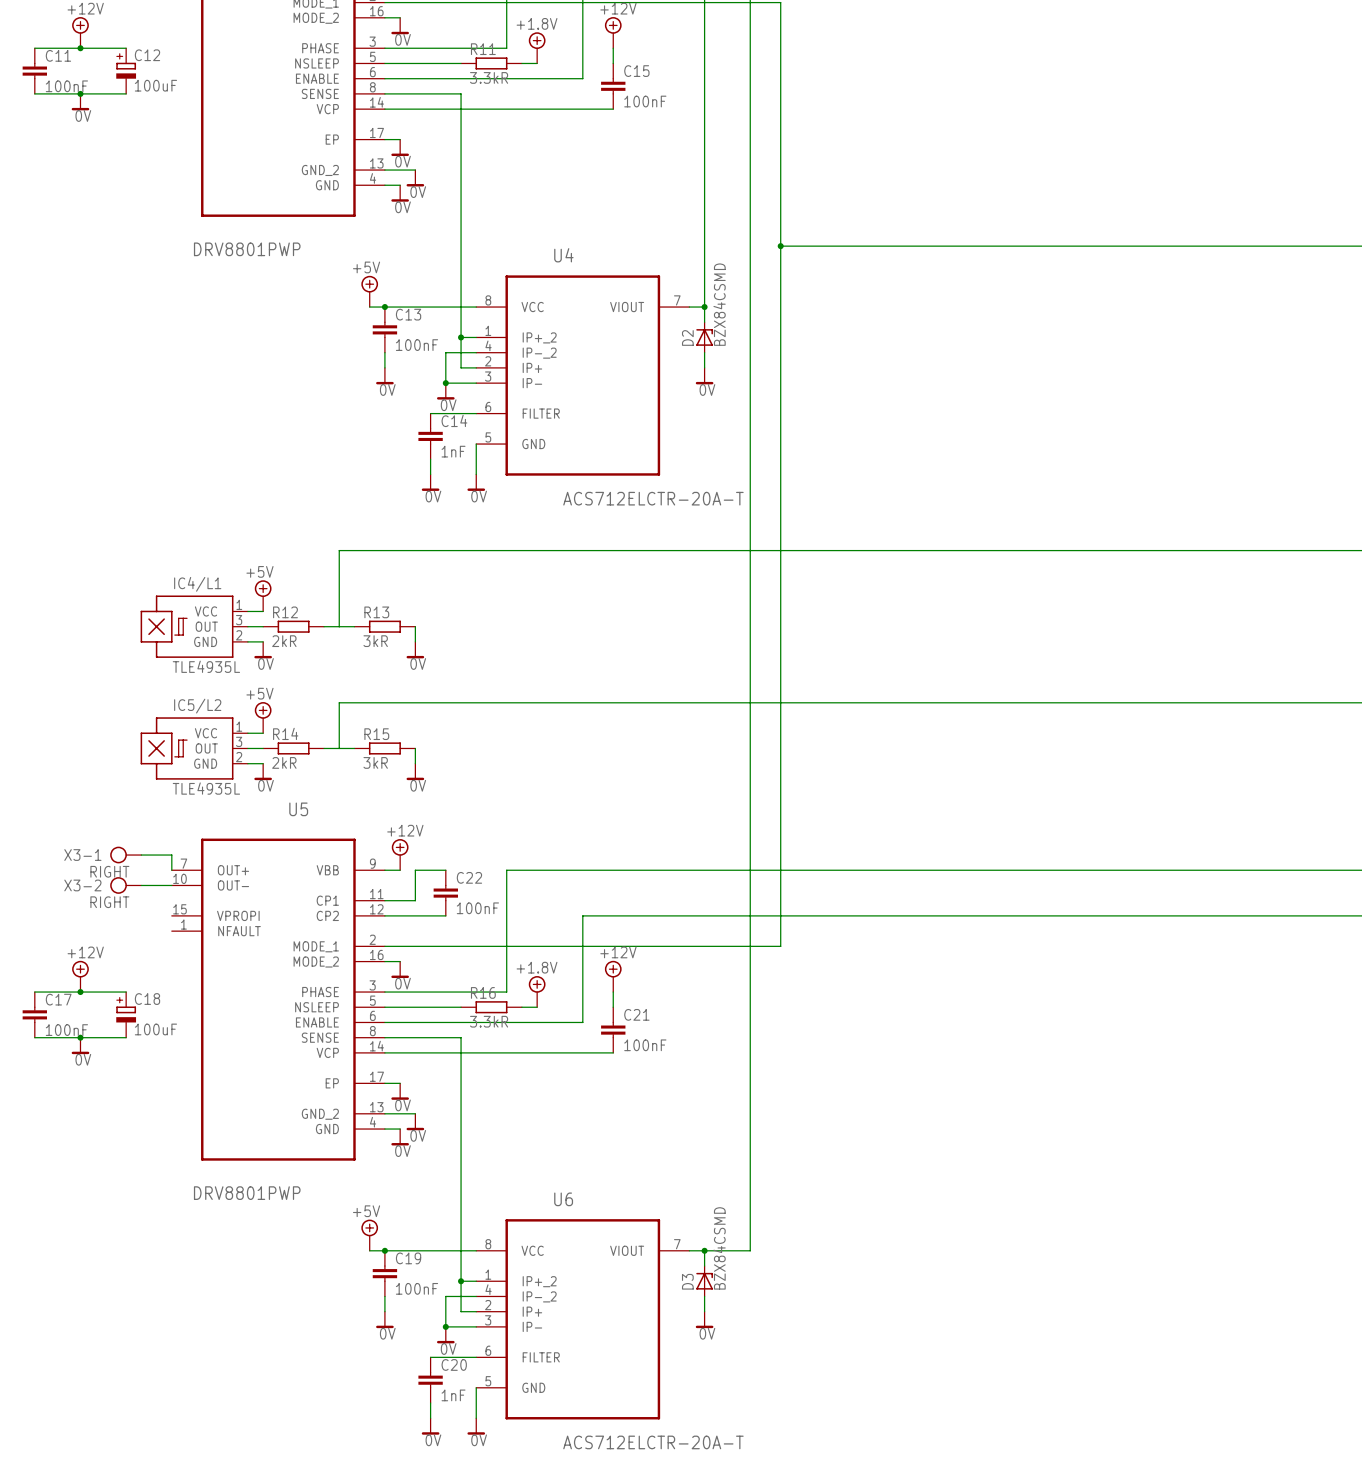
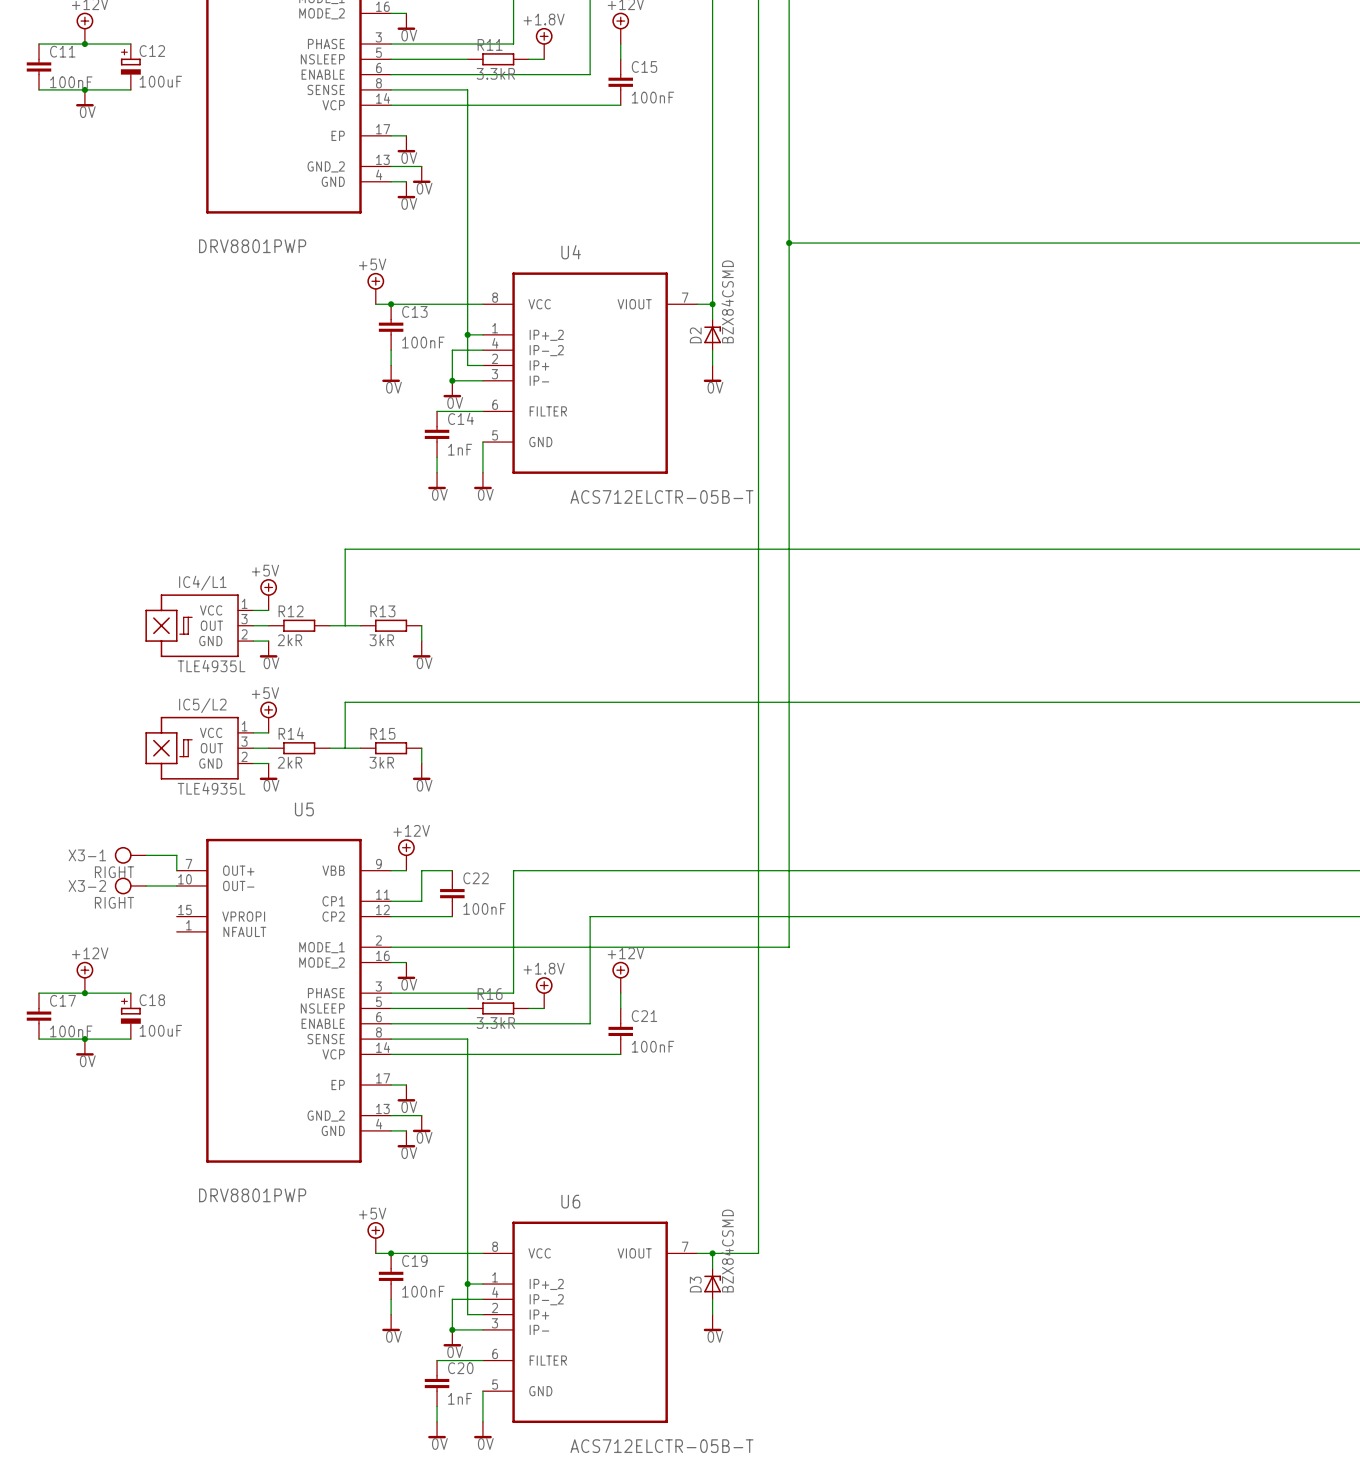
U4 value: ACS712ELCTR-20A-T (653, 498) -> ACS712ELCTR-05B-T (661, 496)
U6 value: ACS712ELCTR-20A-T (653, 1442) -> ACS712ELCTR-05B-T (661, 1446)

